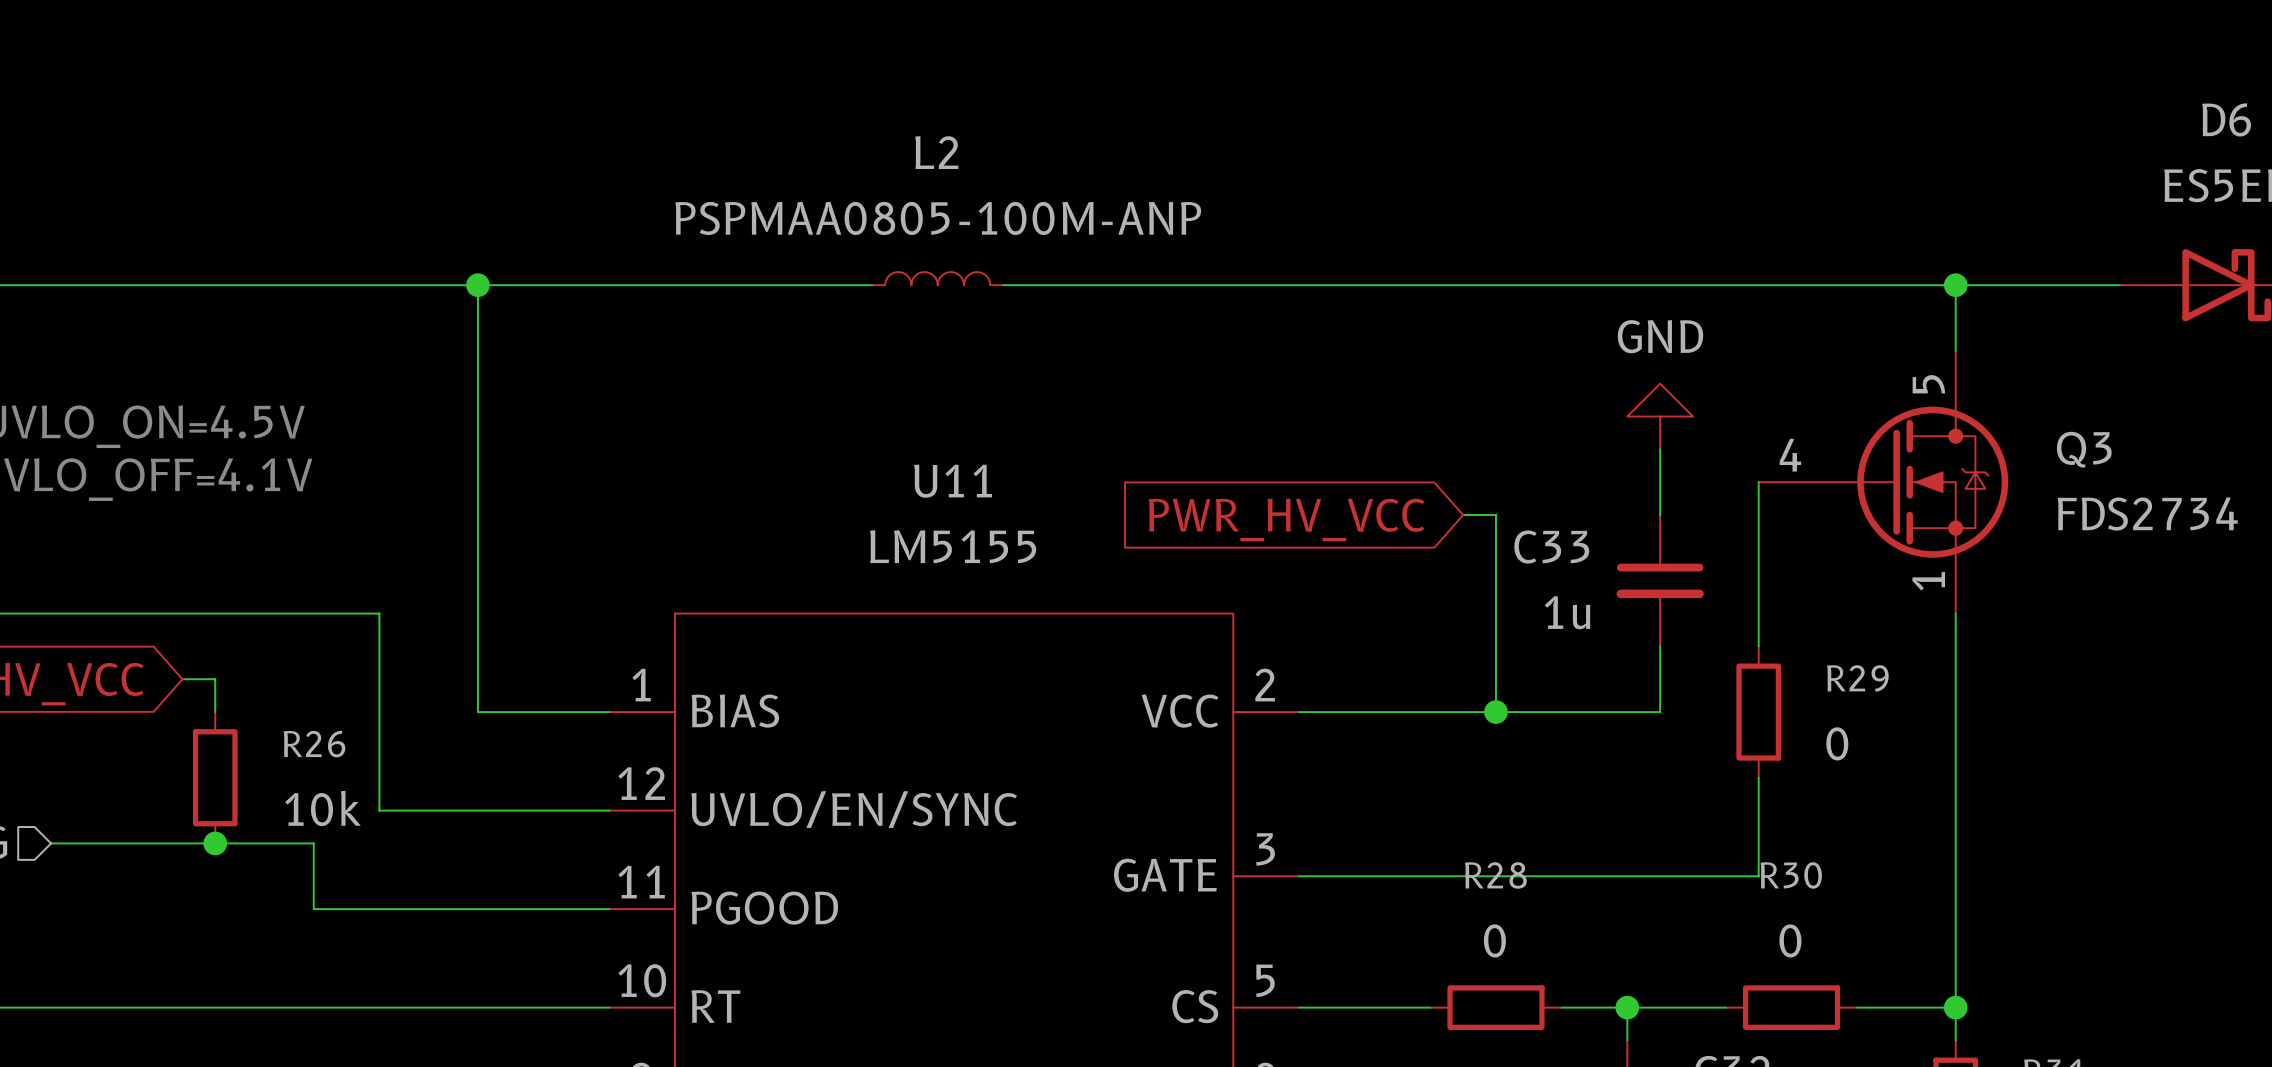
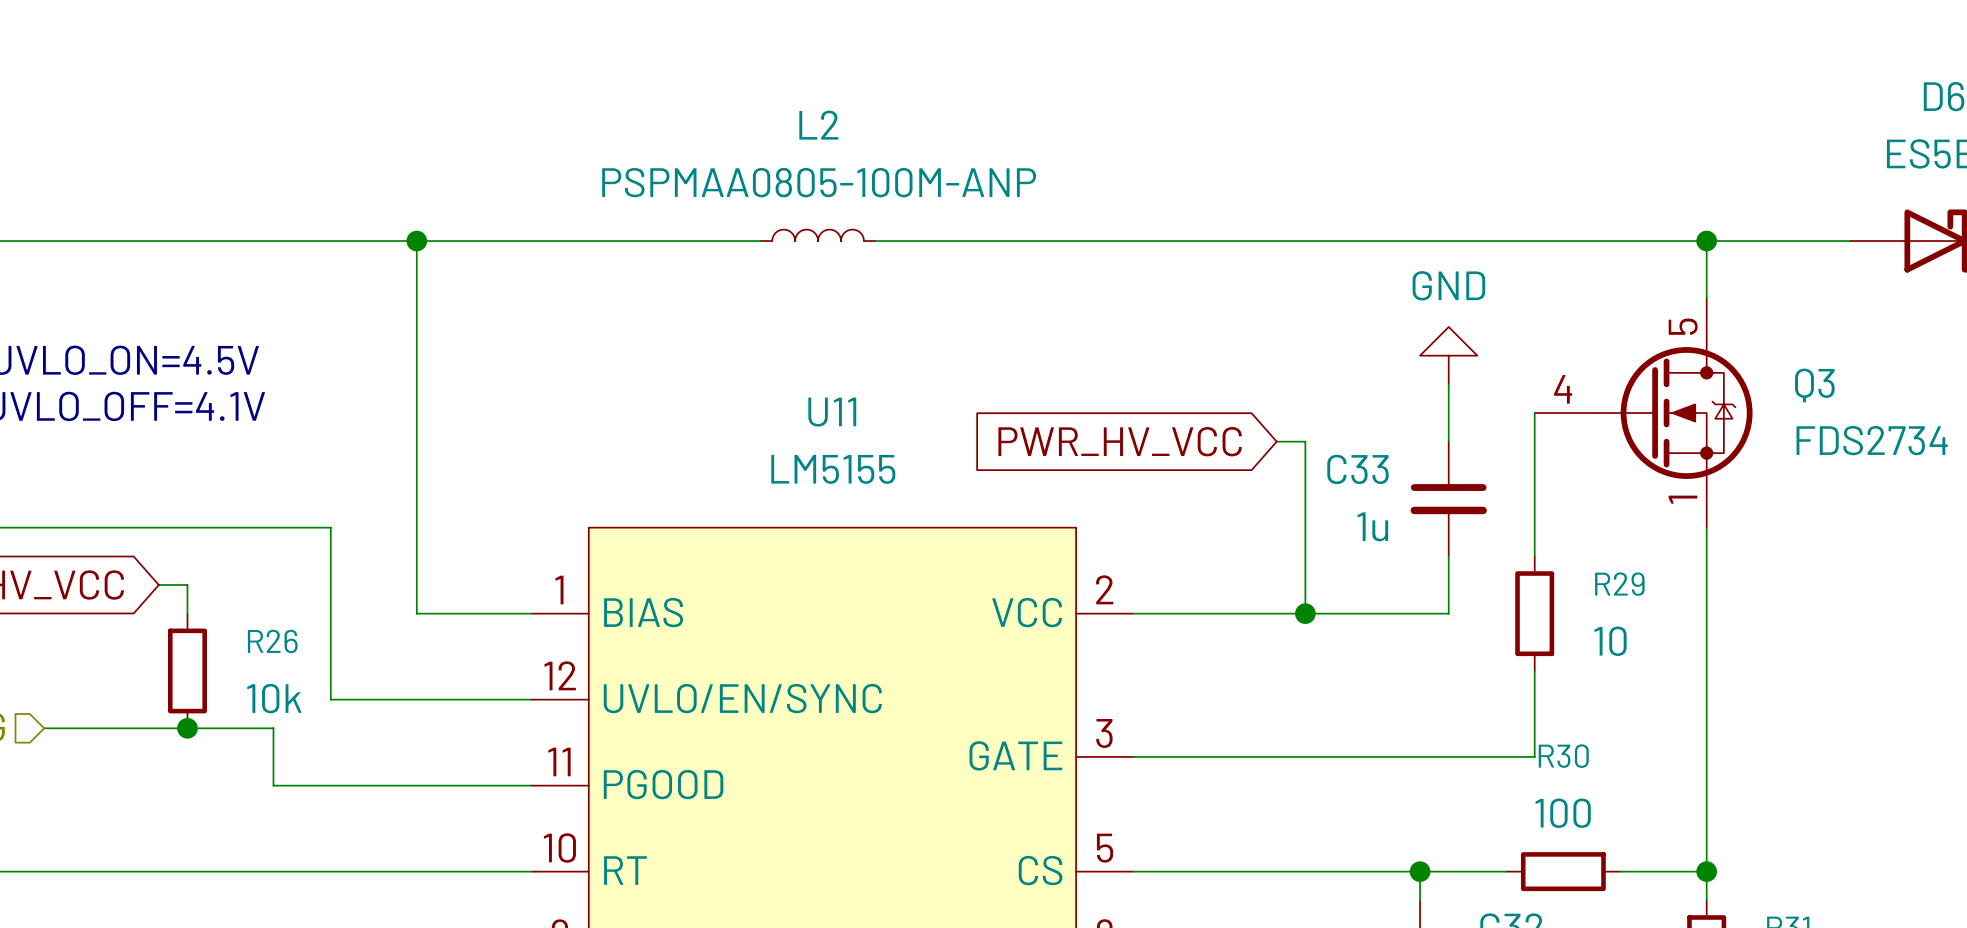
R29 value: 0 (1837, 743) -> 10 (1610, 641)
R30 value: 0 (1790, 940) -> 100 (1563, 813)
wire: none -> (1248, 871) (1362, 871)
R28: 0 (1495, 1007) -> none

